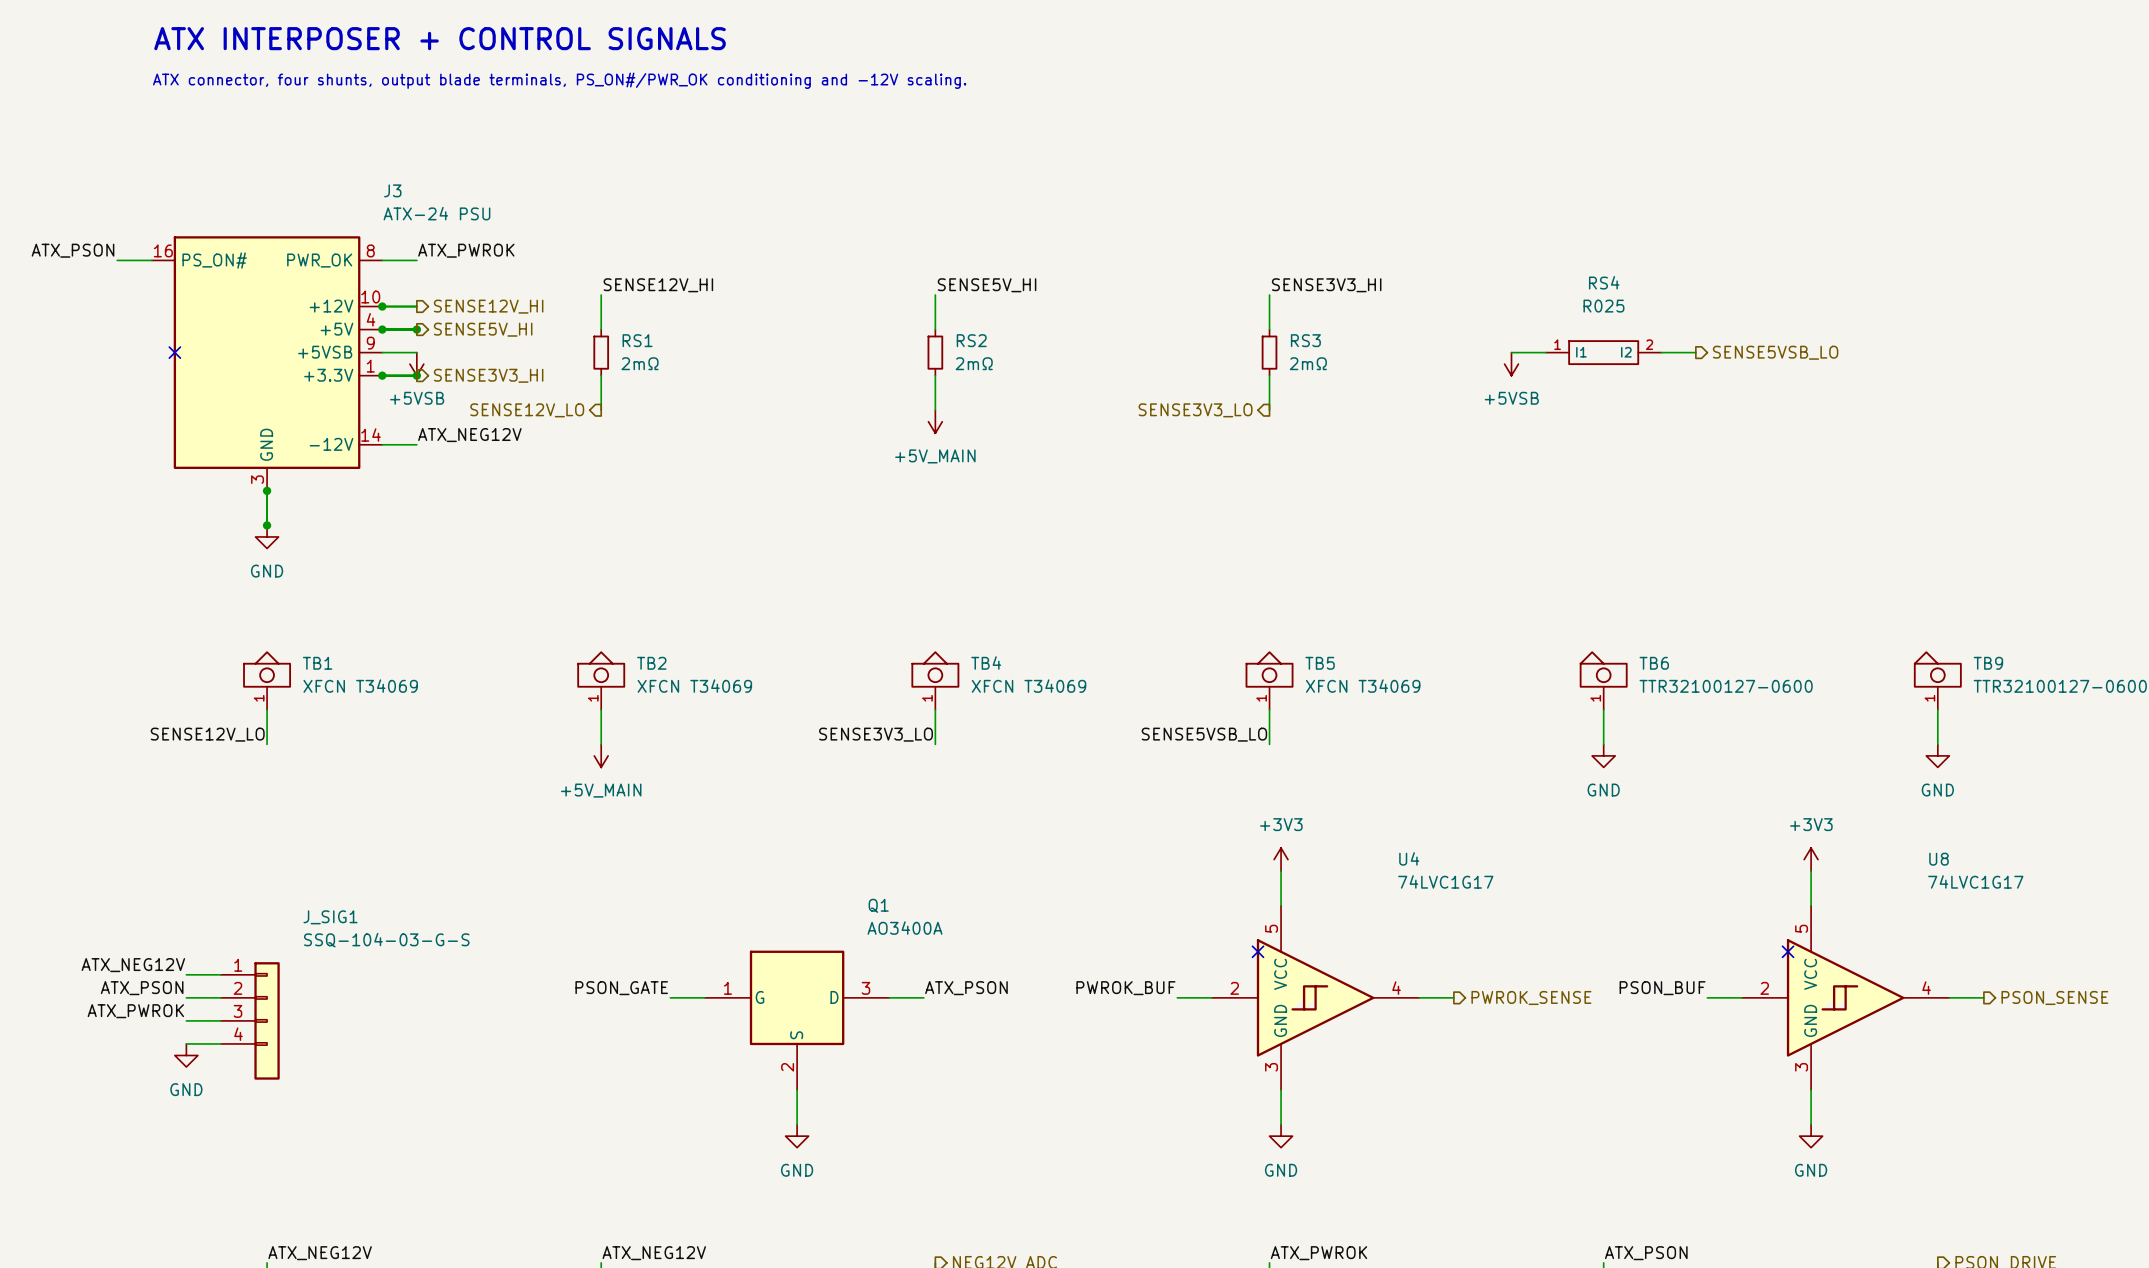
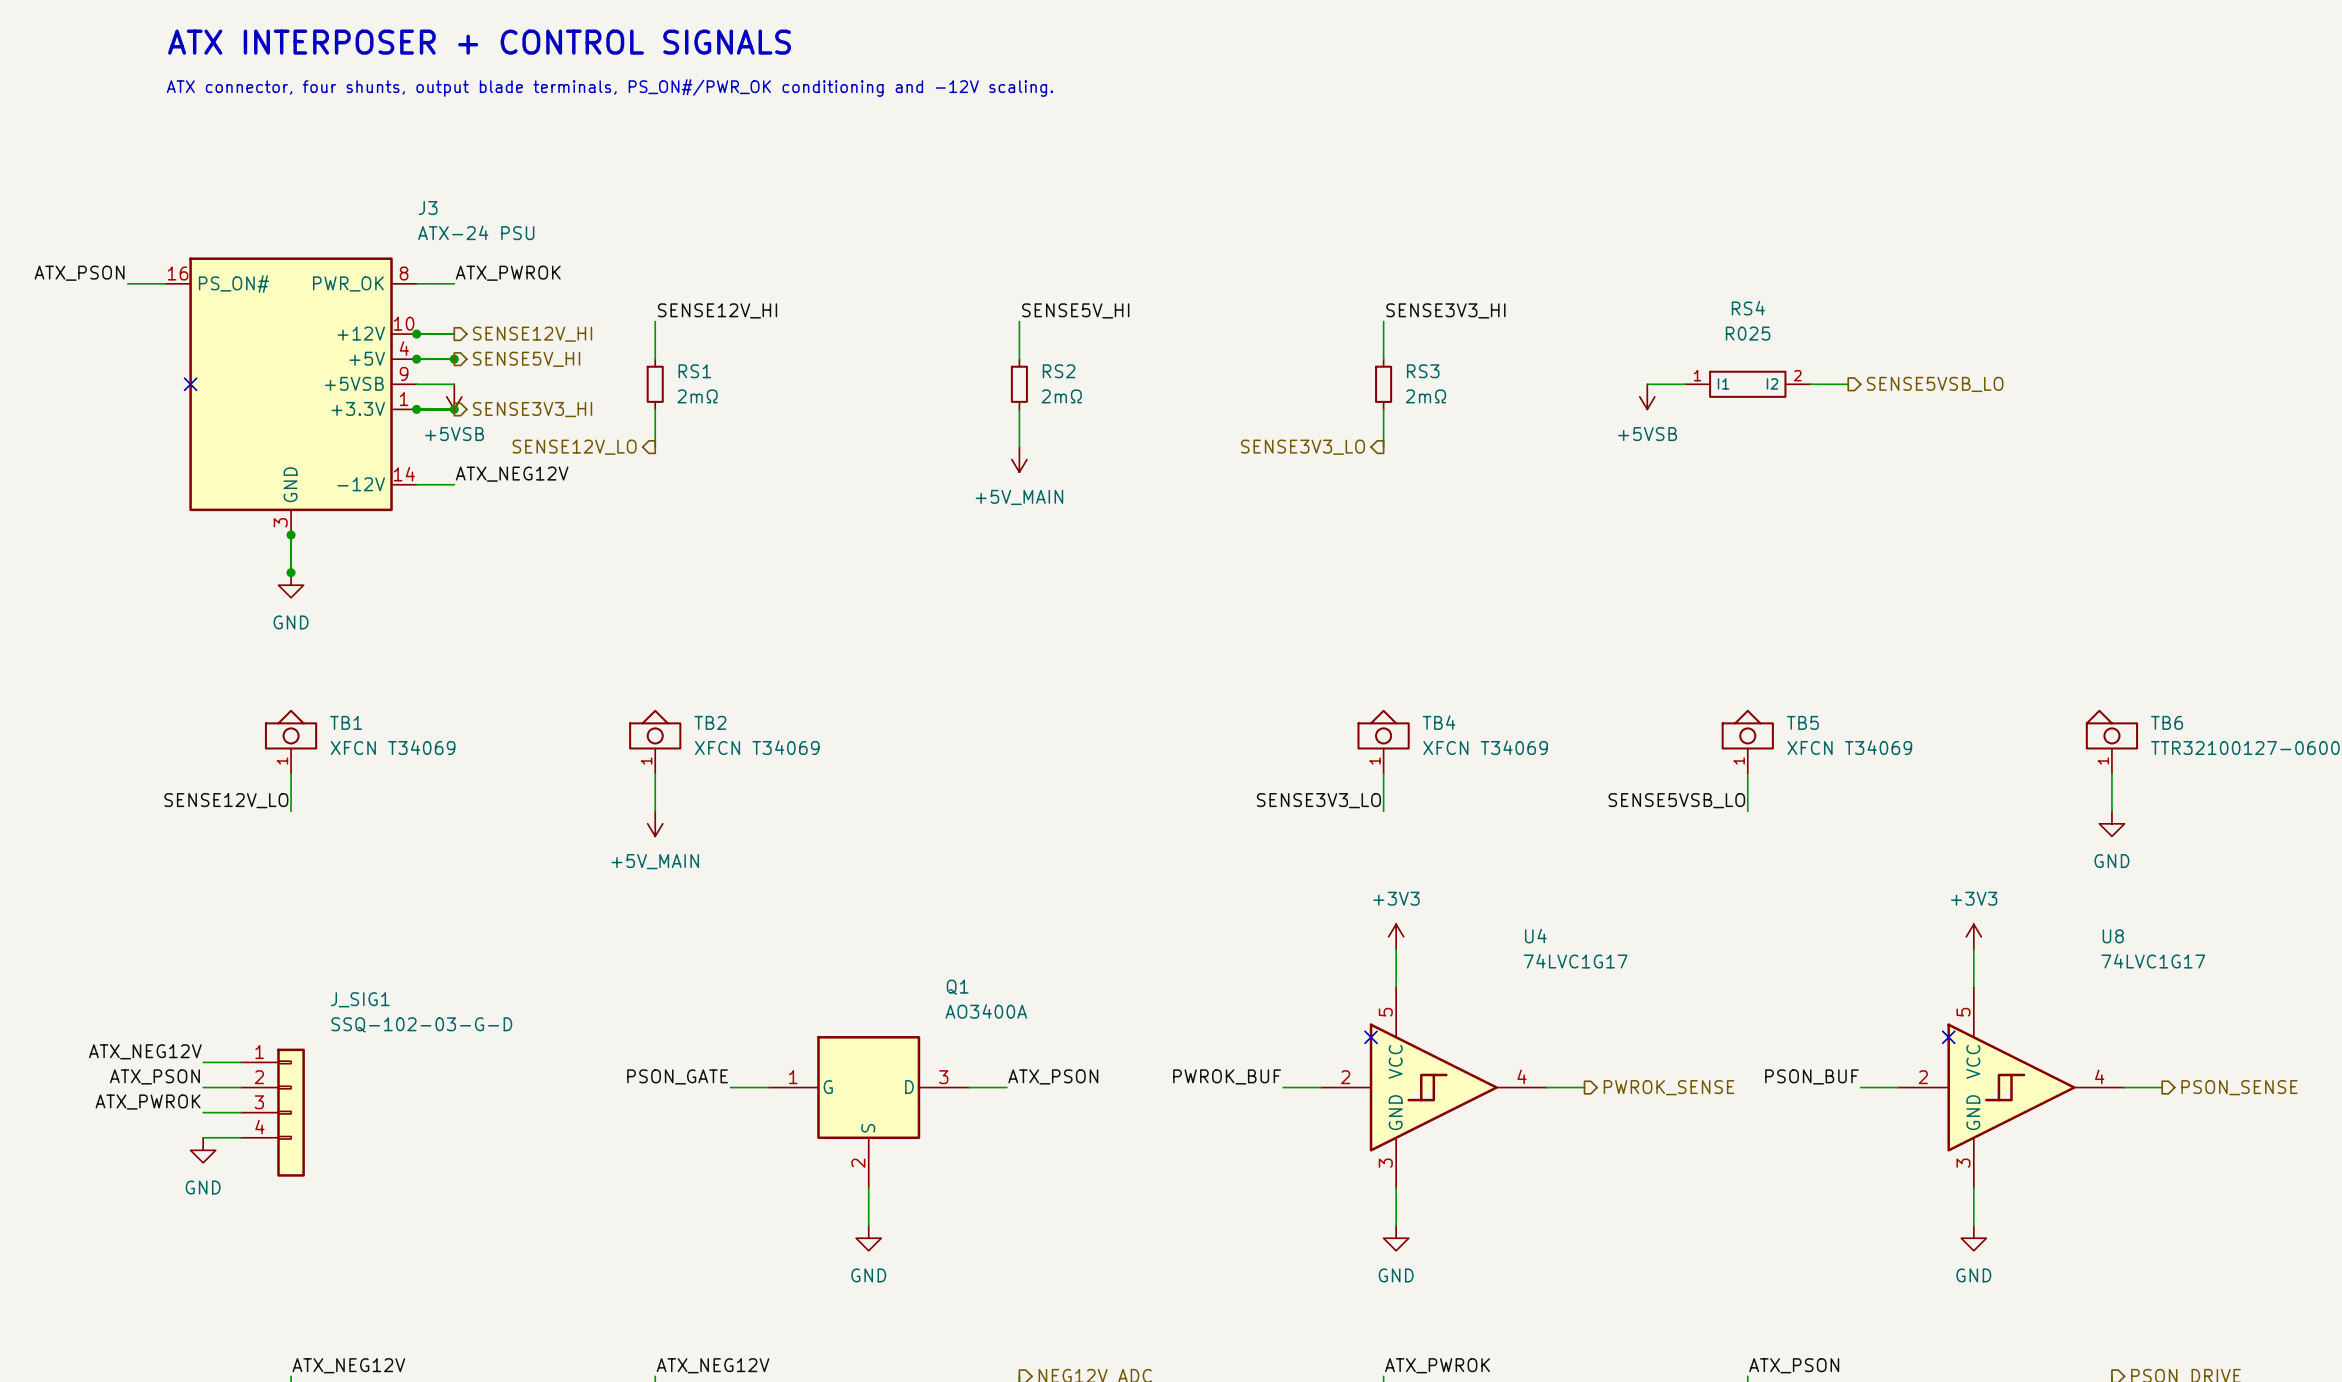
TB5 name: TB5 (1320, 663) -> TB4 (1439, 722)
TB9 name: TB9 (1988, 663) -> TB6 (2167, 722)
TB4: XFCN T34069 (935, 680) -> none
TB6: TTR32100127-0600 (1603, 680) -> none
TB5: none -> XFCN T34069 (1747, 741)
wire: (935, 709) (935, 744) -> none
label: SENSE3V3_LO (876, 734) -> none
label: SENSE5VSB_LO (1204, 734) -> SENSE3V3_LO (1318, 800)
label: none -> SENSE5VSB_LO (1676, 800)
power symbol: GND (1603, 755) -> none
J_SIG1 value: SSQ-104-03-G-S (386, 940) -> SSQ-102-03-G-D (421, 1024)

